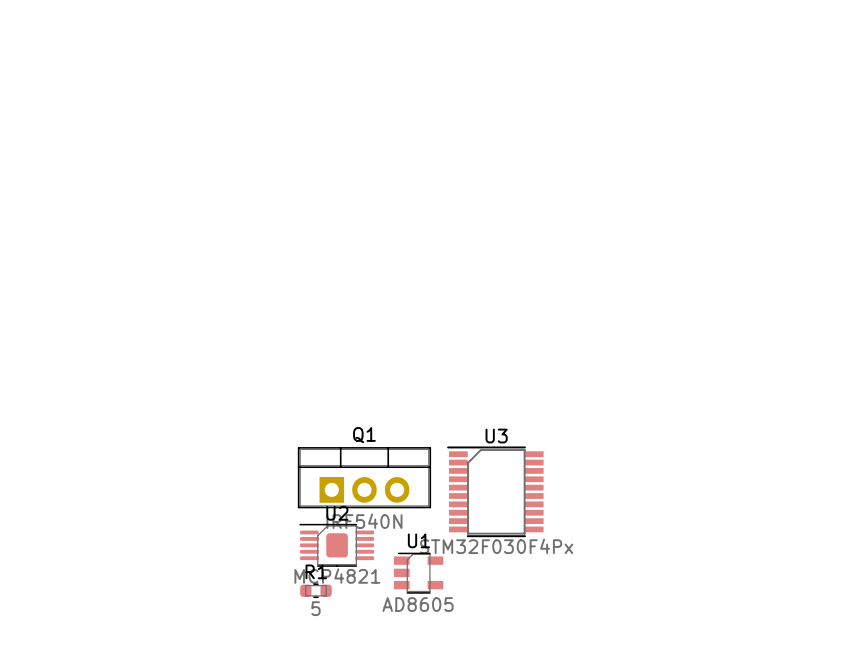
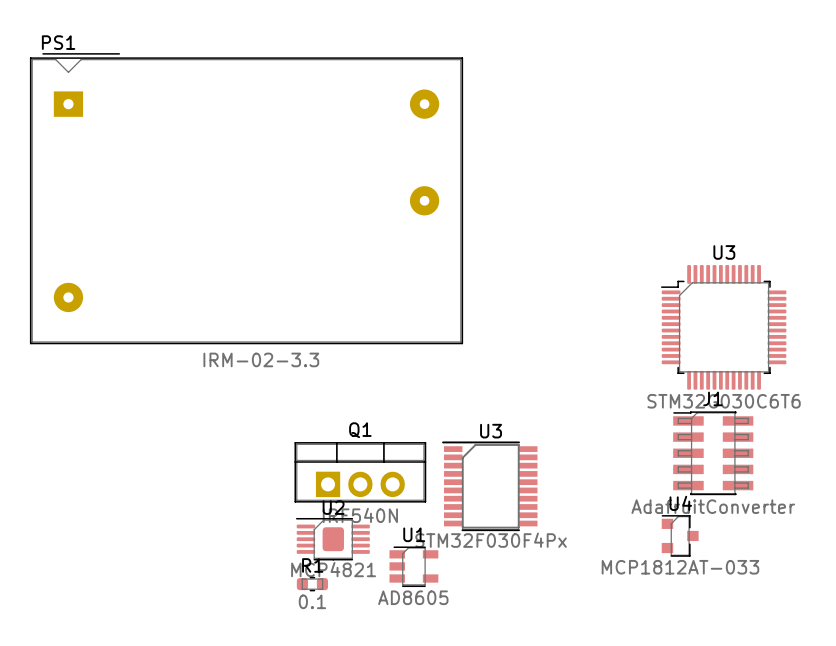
PS1: none -> IRM-02-3.3 (246, 198)
U3: none -> STM32G030C6T6 (723, 327)
J1: none -> AdafruitConverter (713, 453)
U4: none -> MCP1812AT-033 (680, 535)
R1 value: 5 (315, 608) -> 0.1 (312, 601)

